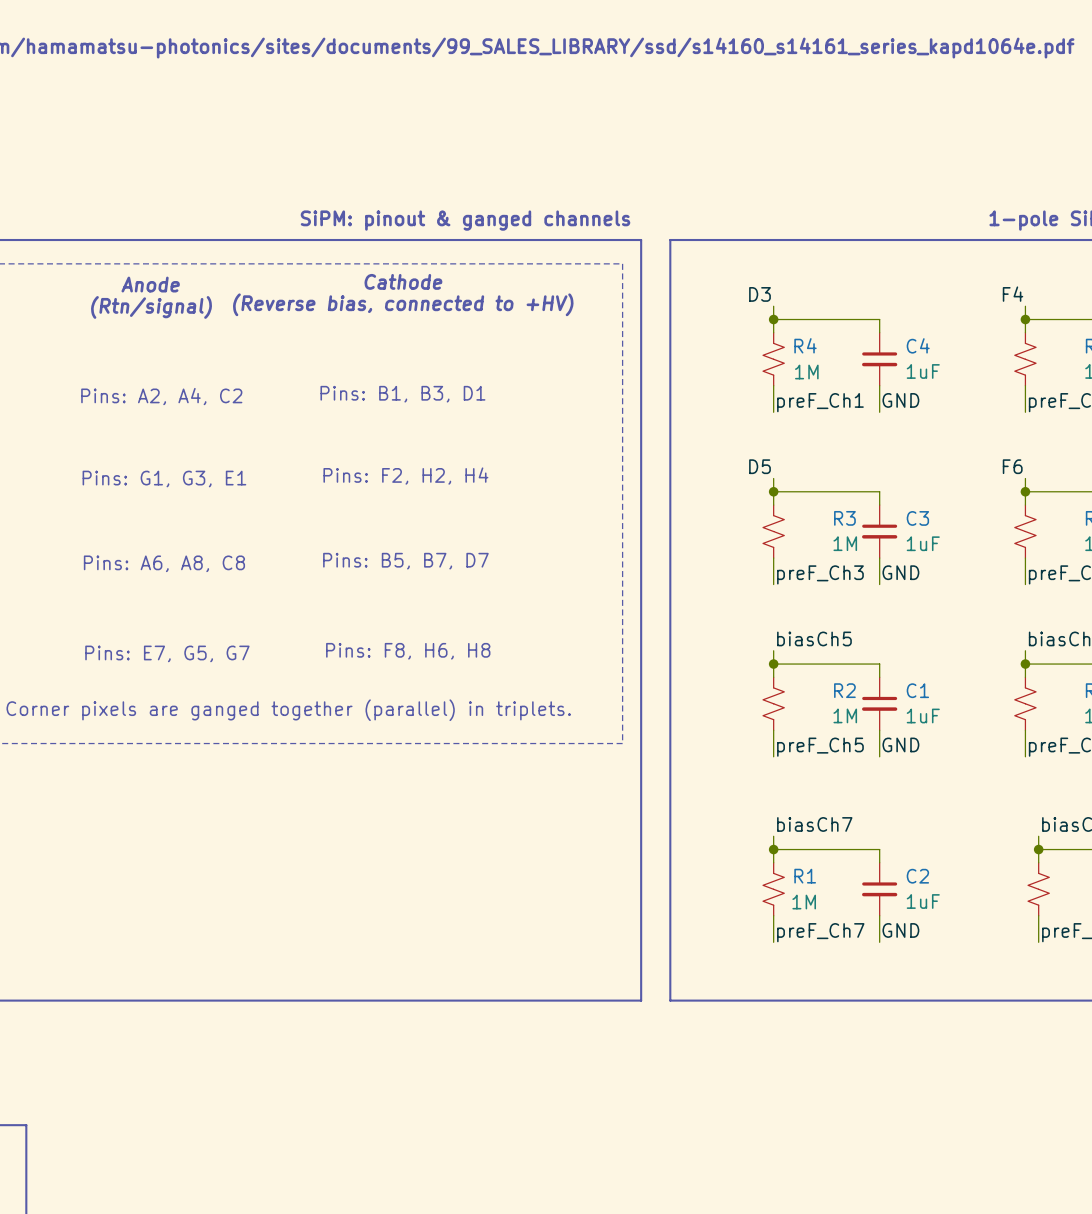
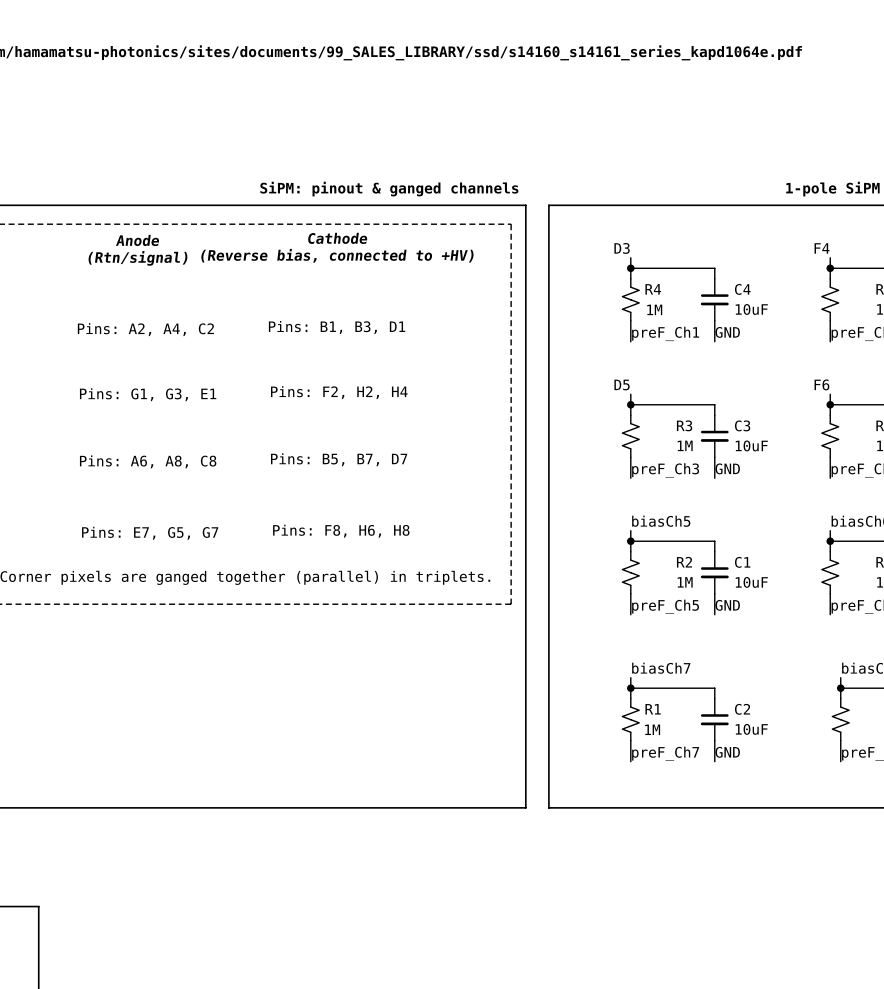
C4 value: 1uF (923, 371) -> 10uF (751, 309)
C3 value: 1uF (923, 543) -> 10uF (751, 445)
C1 value: 1uF (923, 716) -> 10uF (751, 582)
C2 value: 1uF (923, 901) -> 10uF (751, 729)

